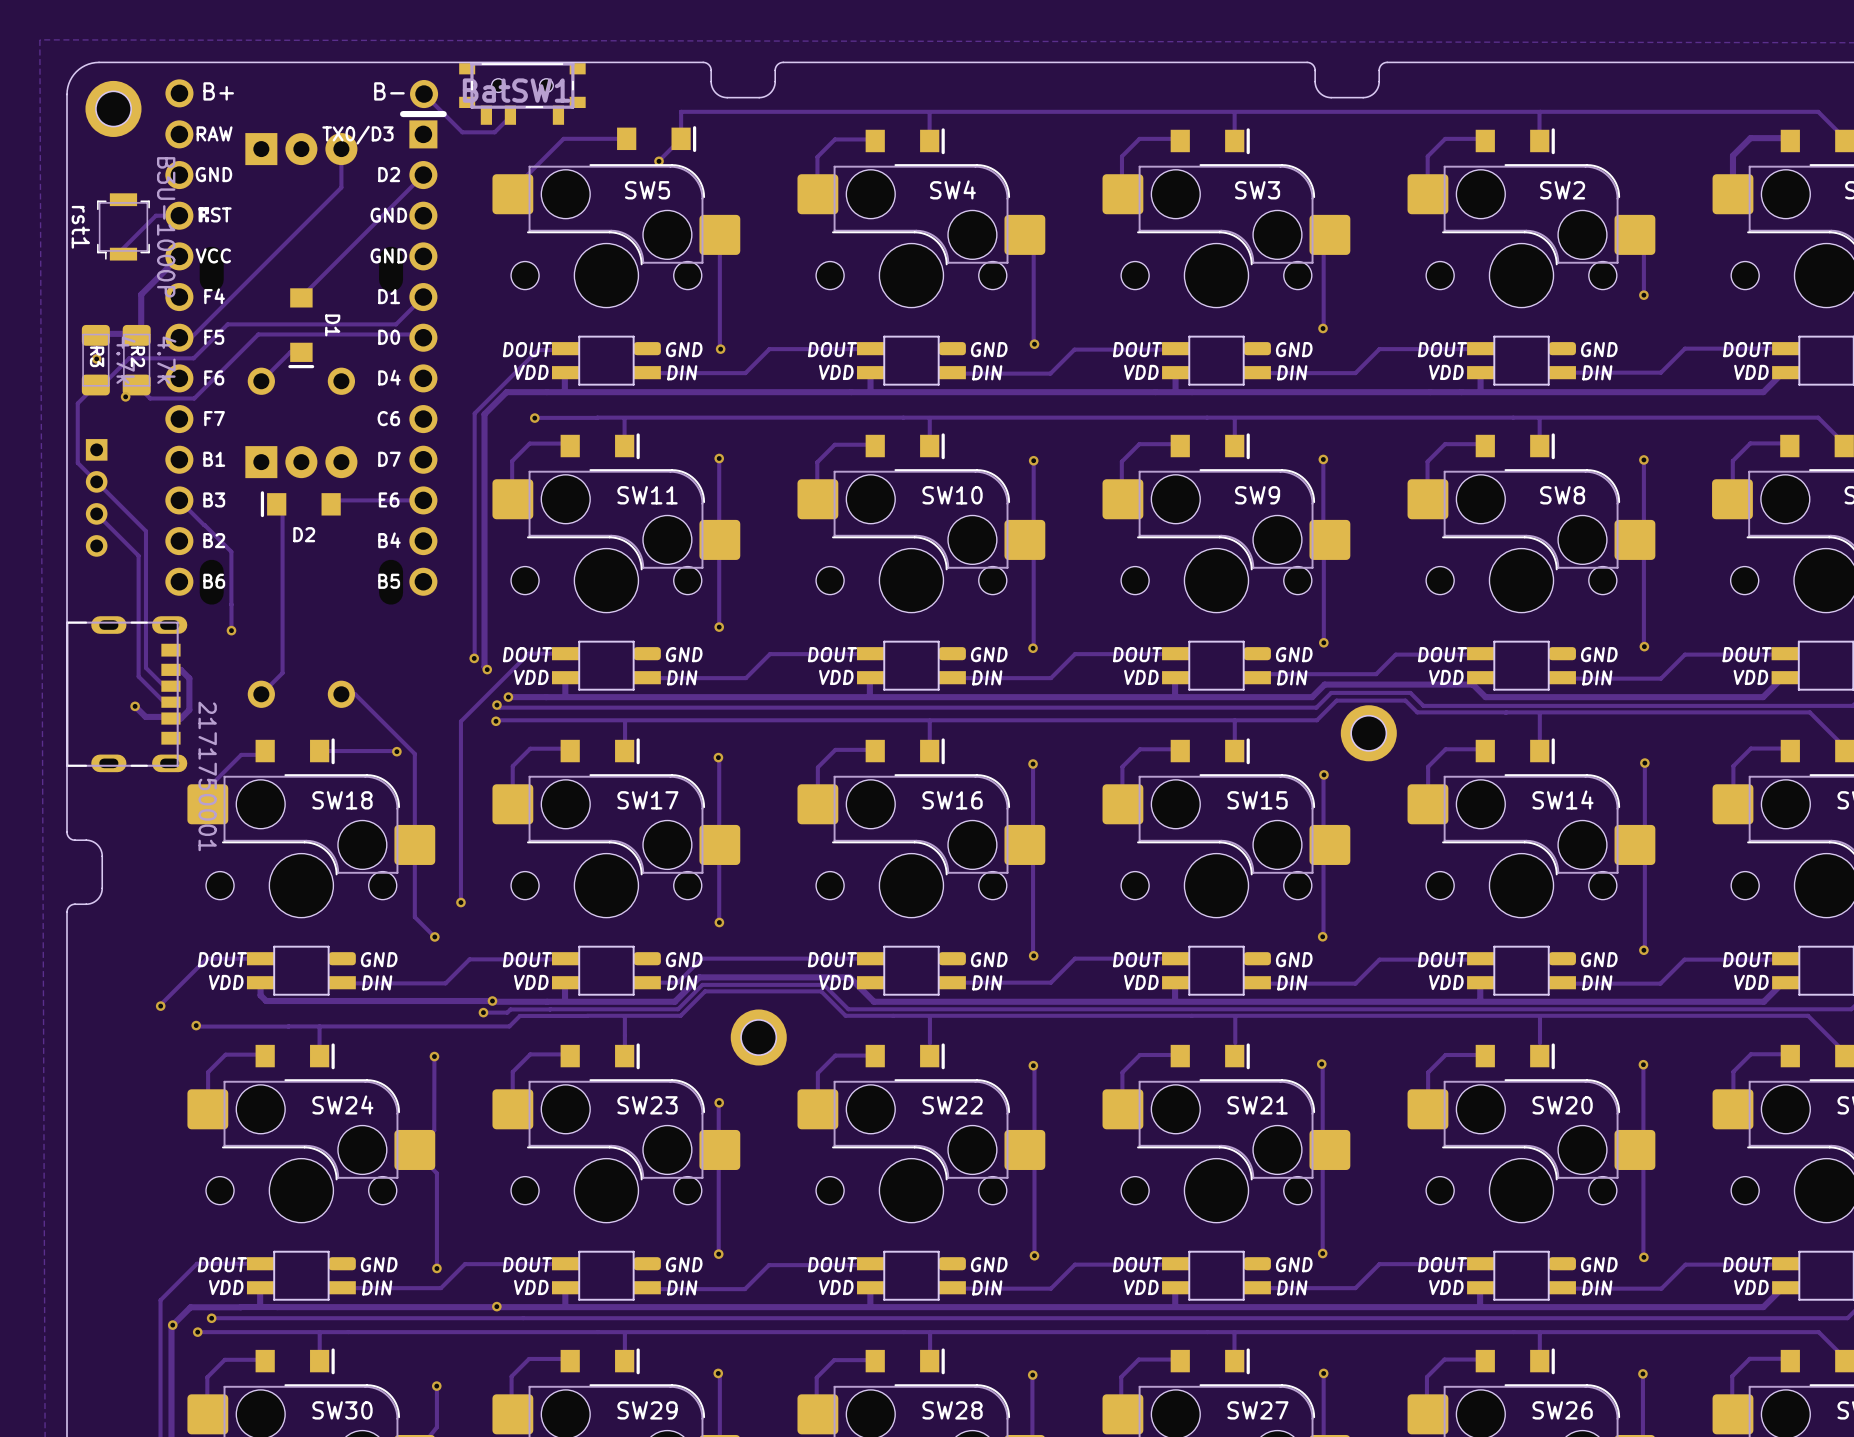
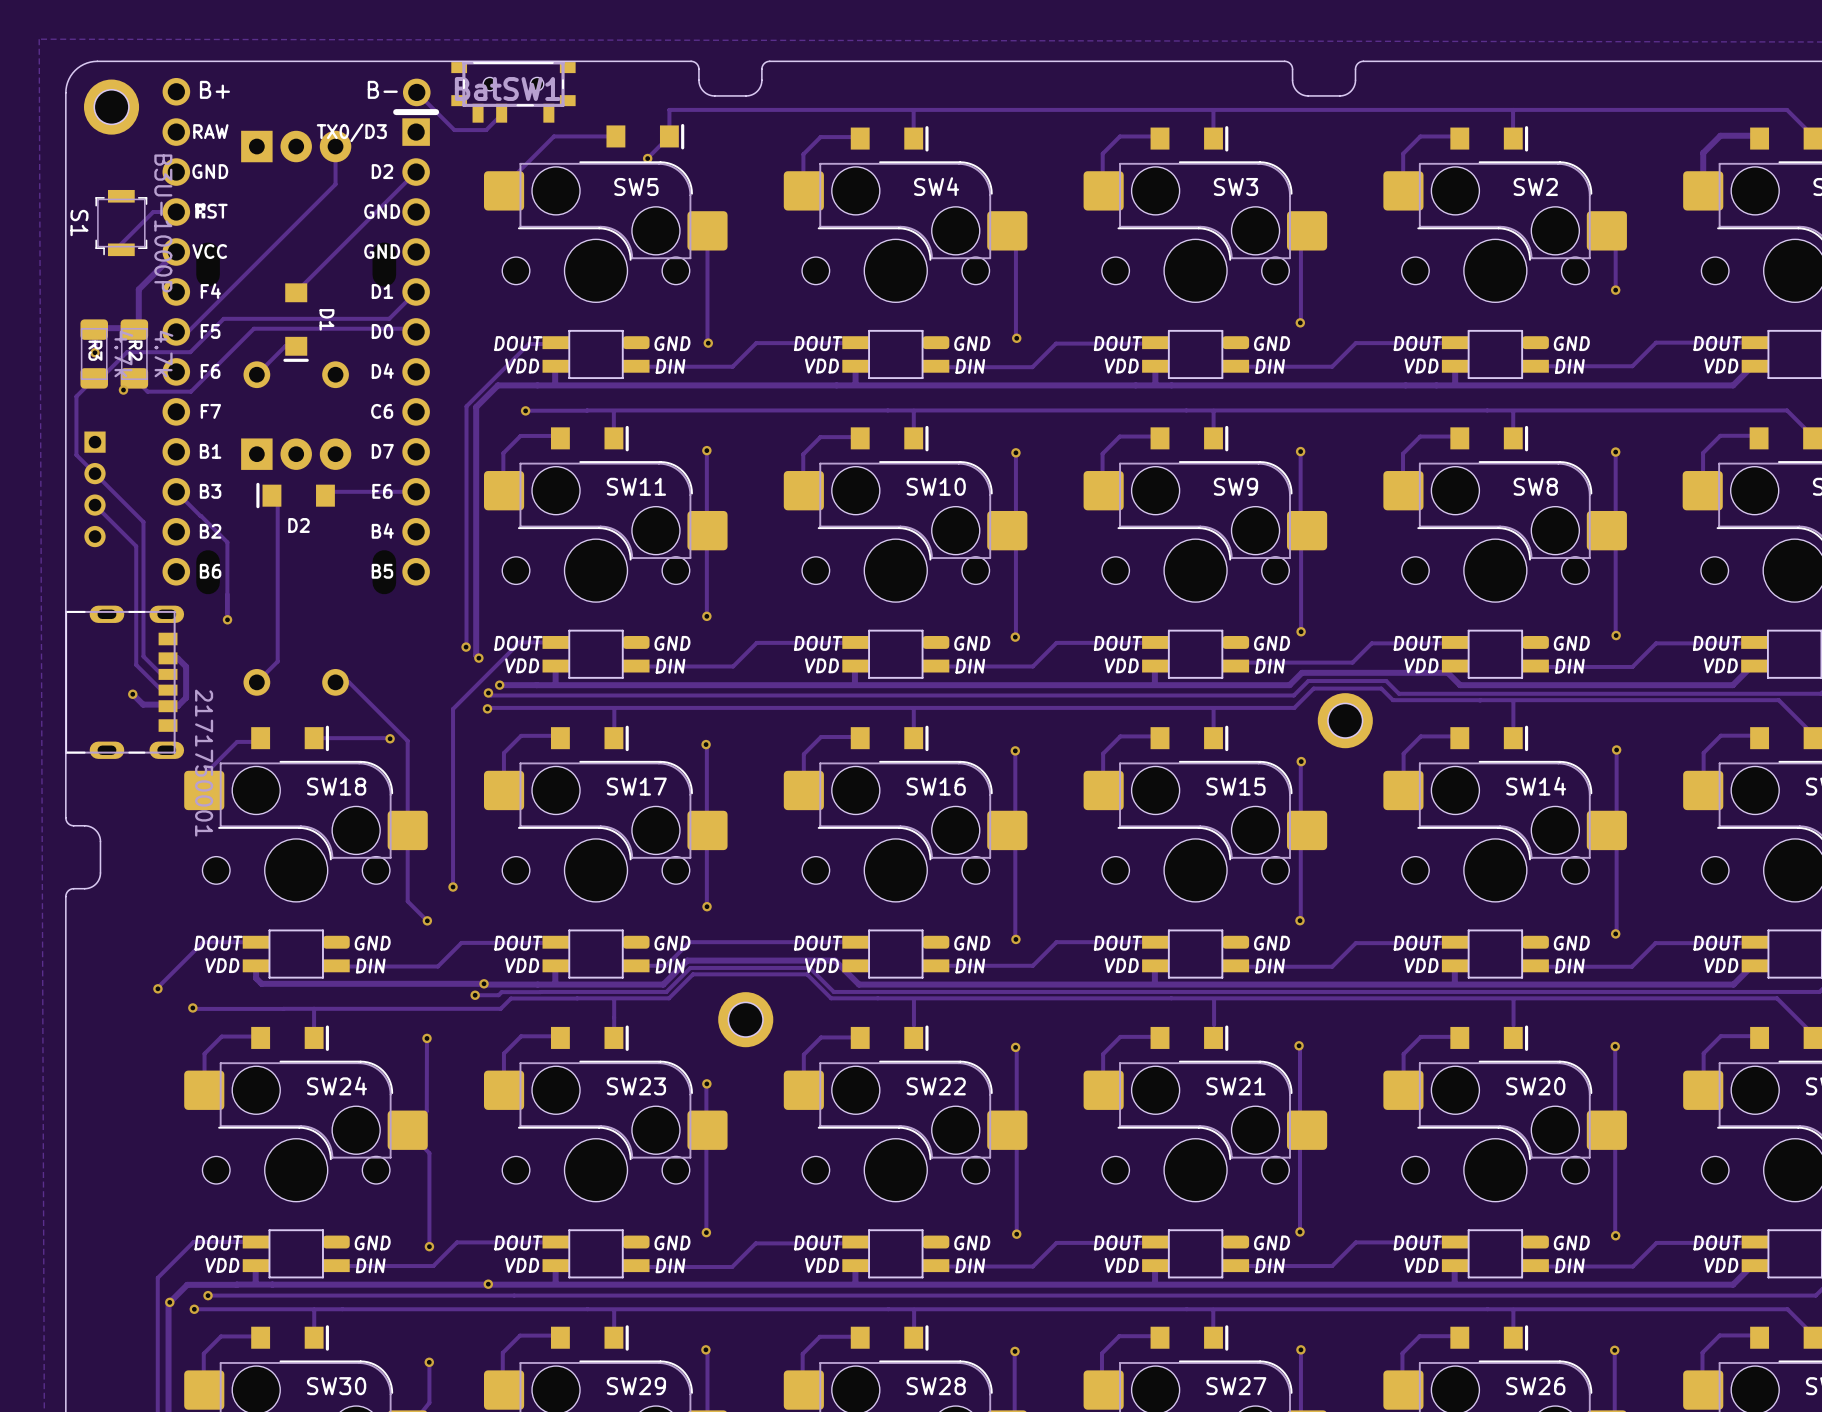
rst1 name: rst1 (80, 227) -> S1 (79, 223)

